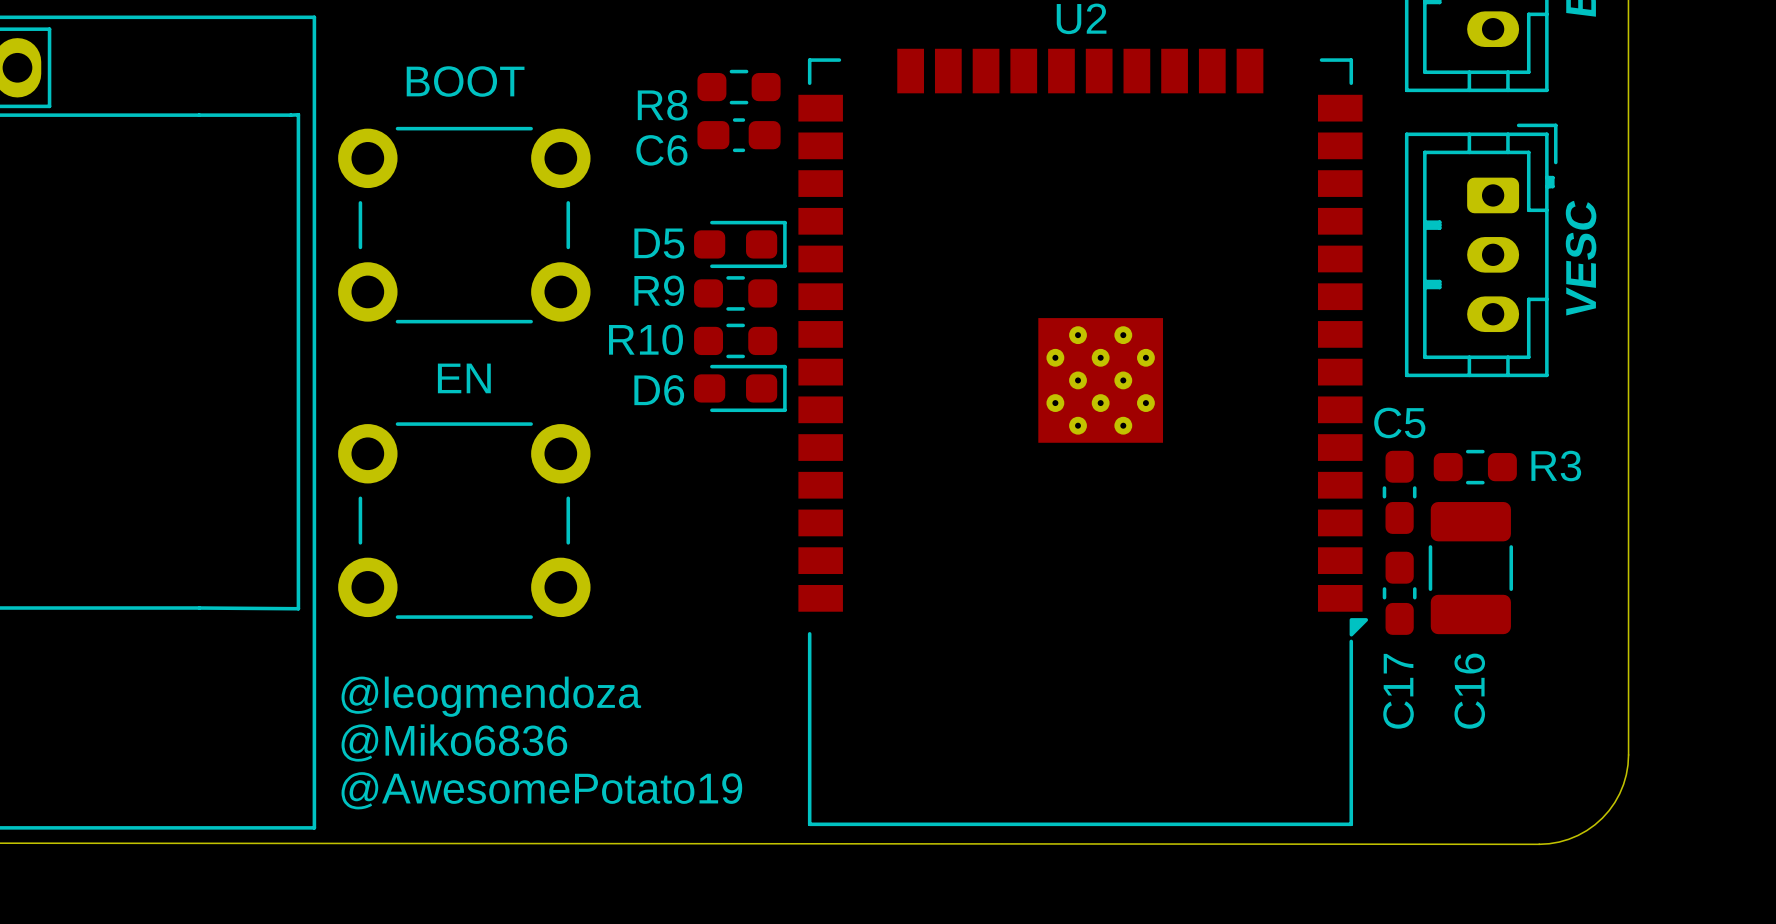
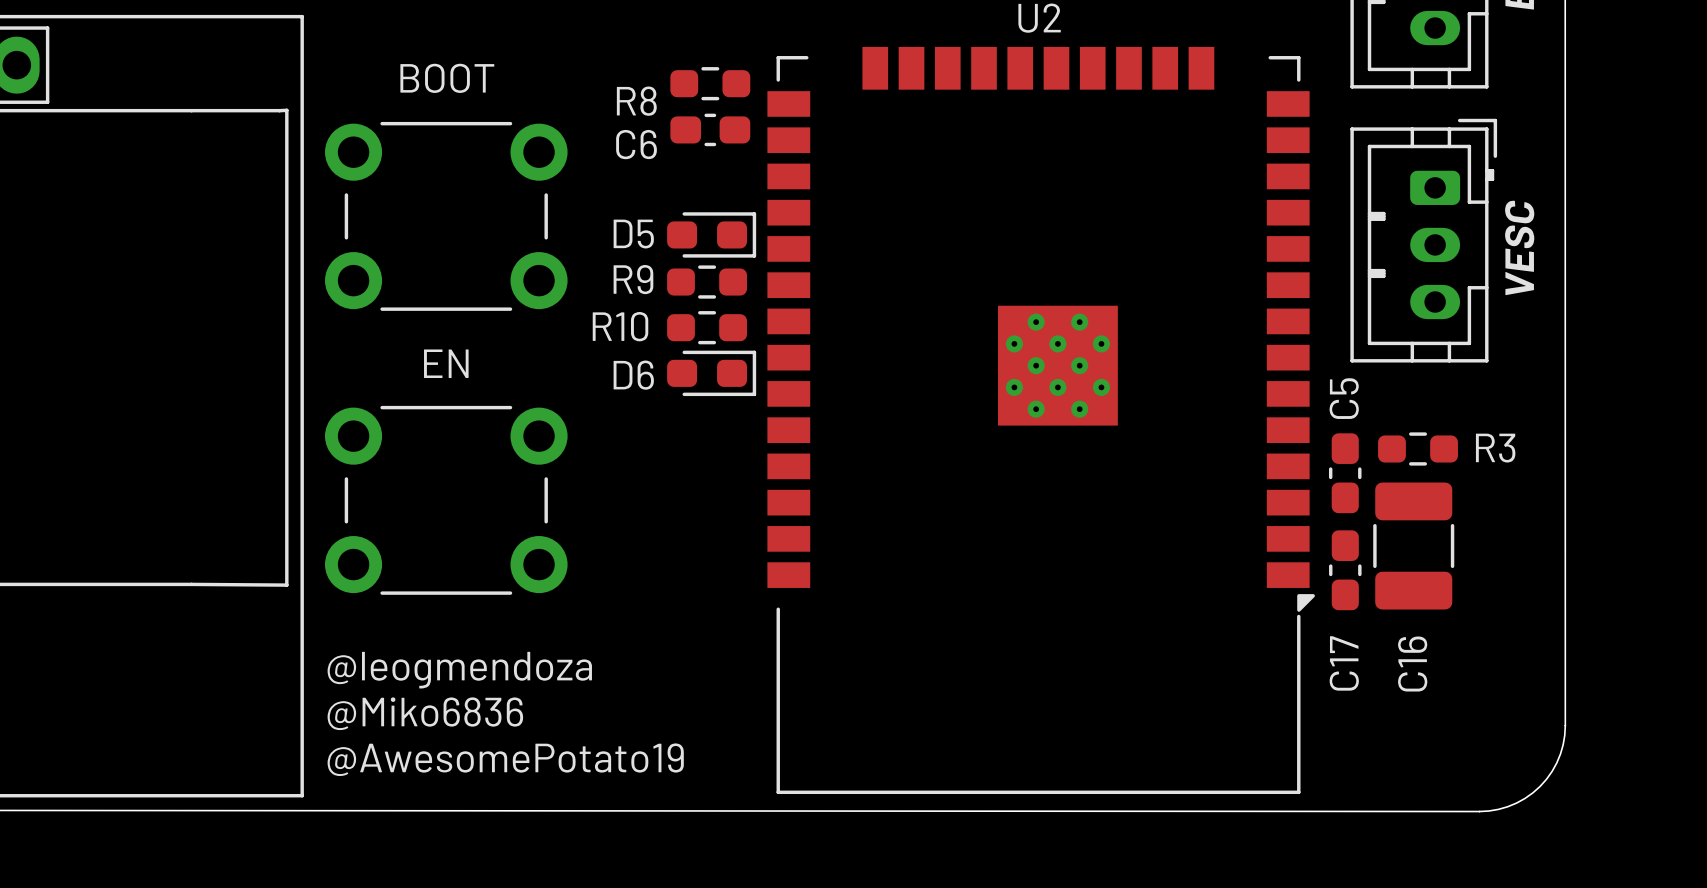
C5 name rotation: 0° (1399, 422) -> 90° counterclockwise (1344, 398)

